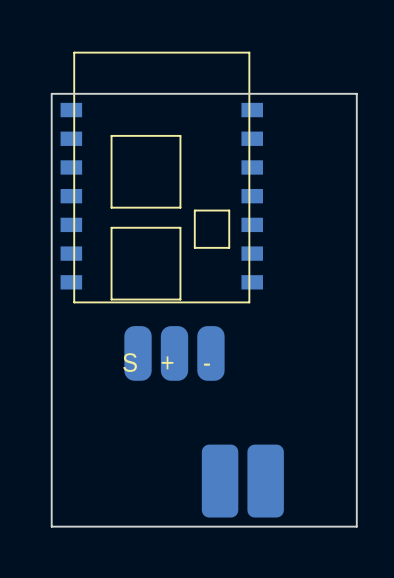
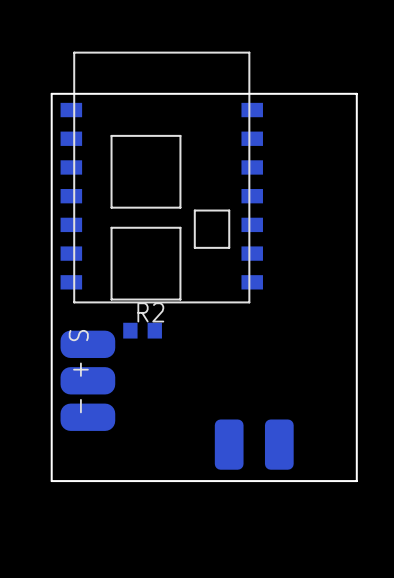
R2: none -> (142, 330)
part: (174, 353) -> none
part: none -> (87, 380)
part: none -> (229, 444)
part: none -> (279, 444)
part: (220, 481) -> none
part: (265, 481) -> none
board edge: (356, 481) (356, 526) (51, 526) (51, 481) -> (356, 481) (51, 481)

